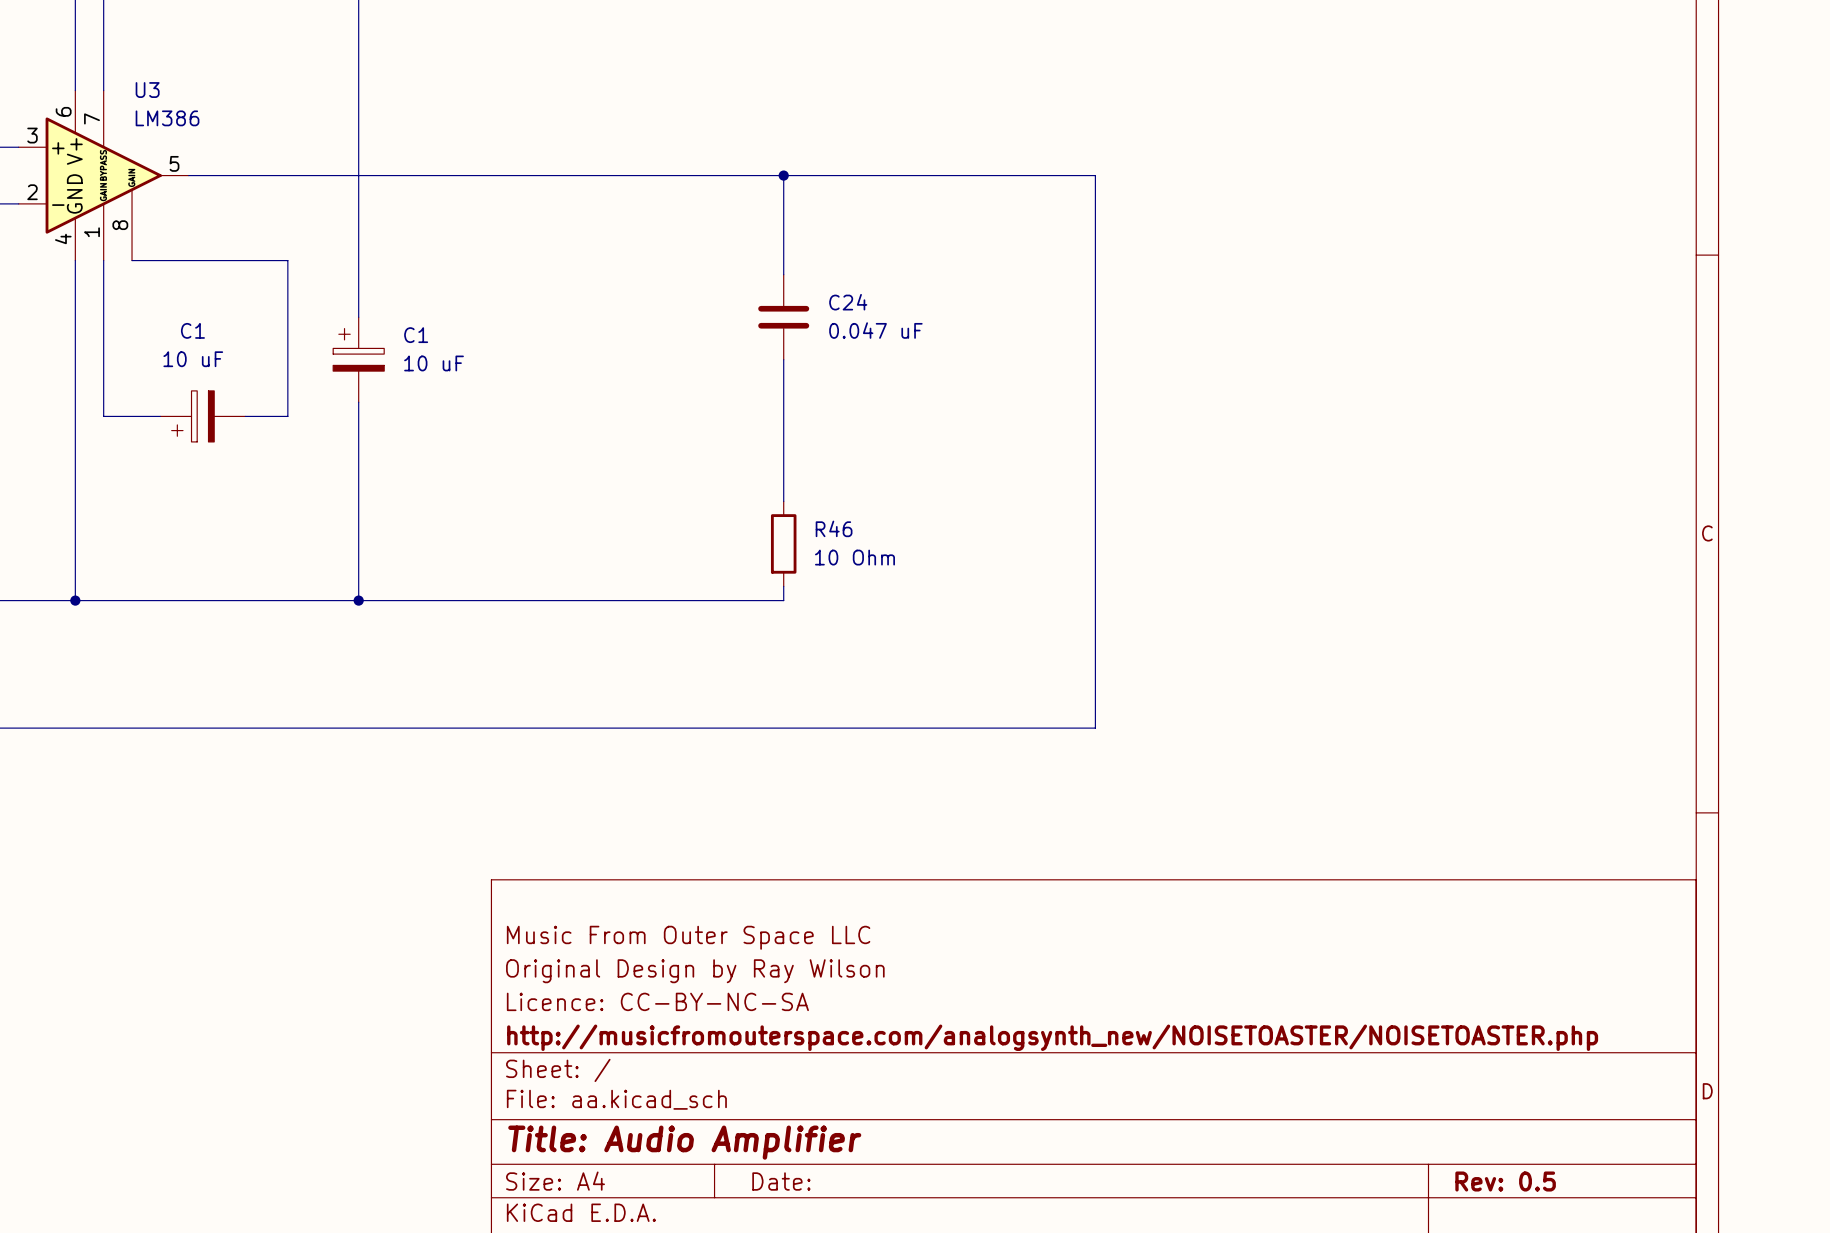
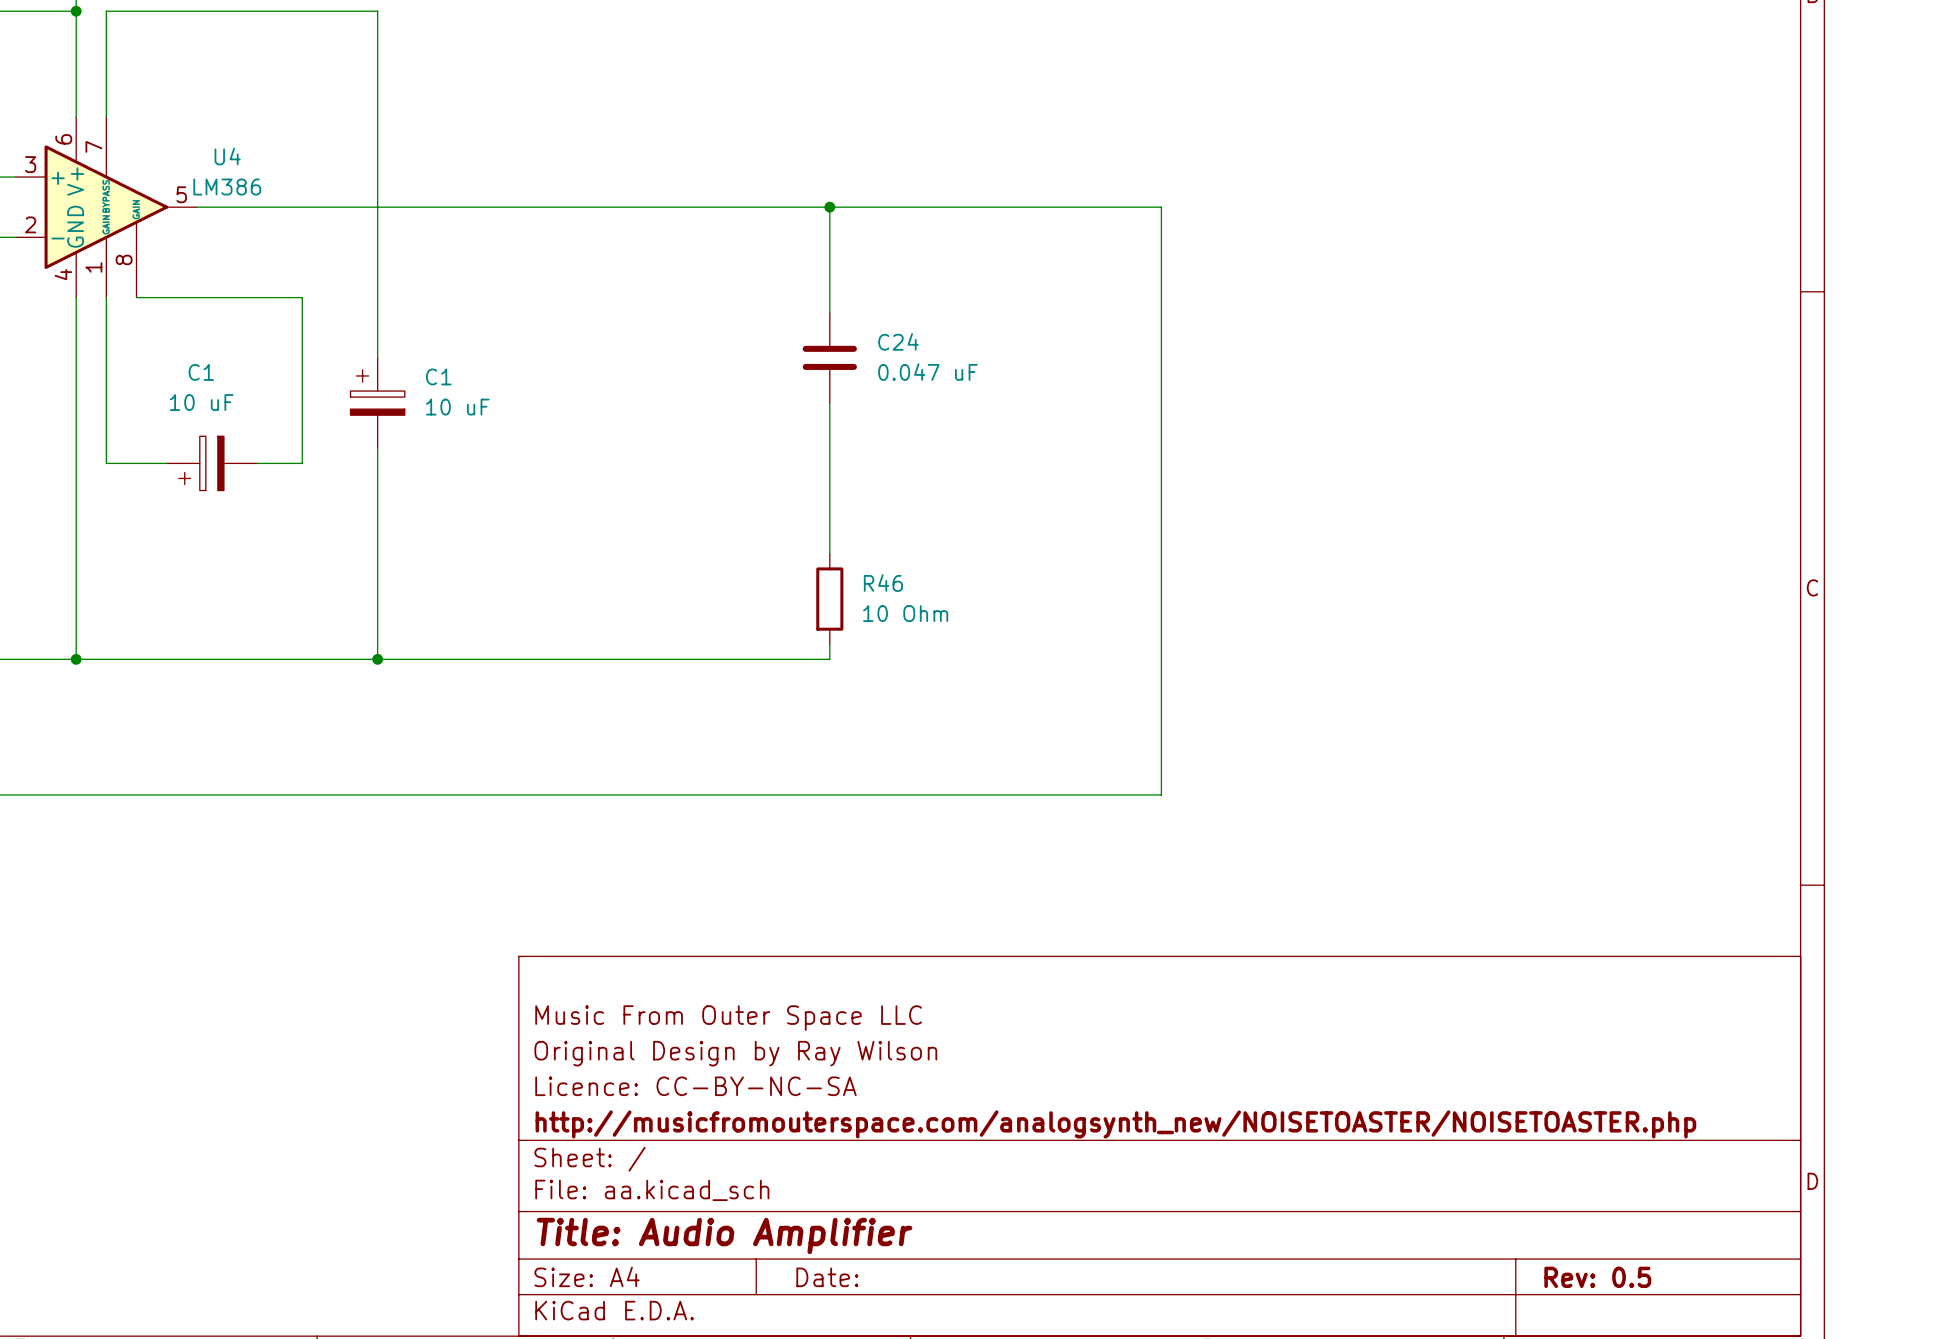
U3 name: U3 (147, 90) -> U4 (227, 156)
U3 value position: LM386 (167, 118) -> LM386 (227, 187)

